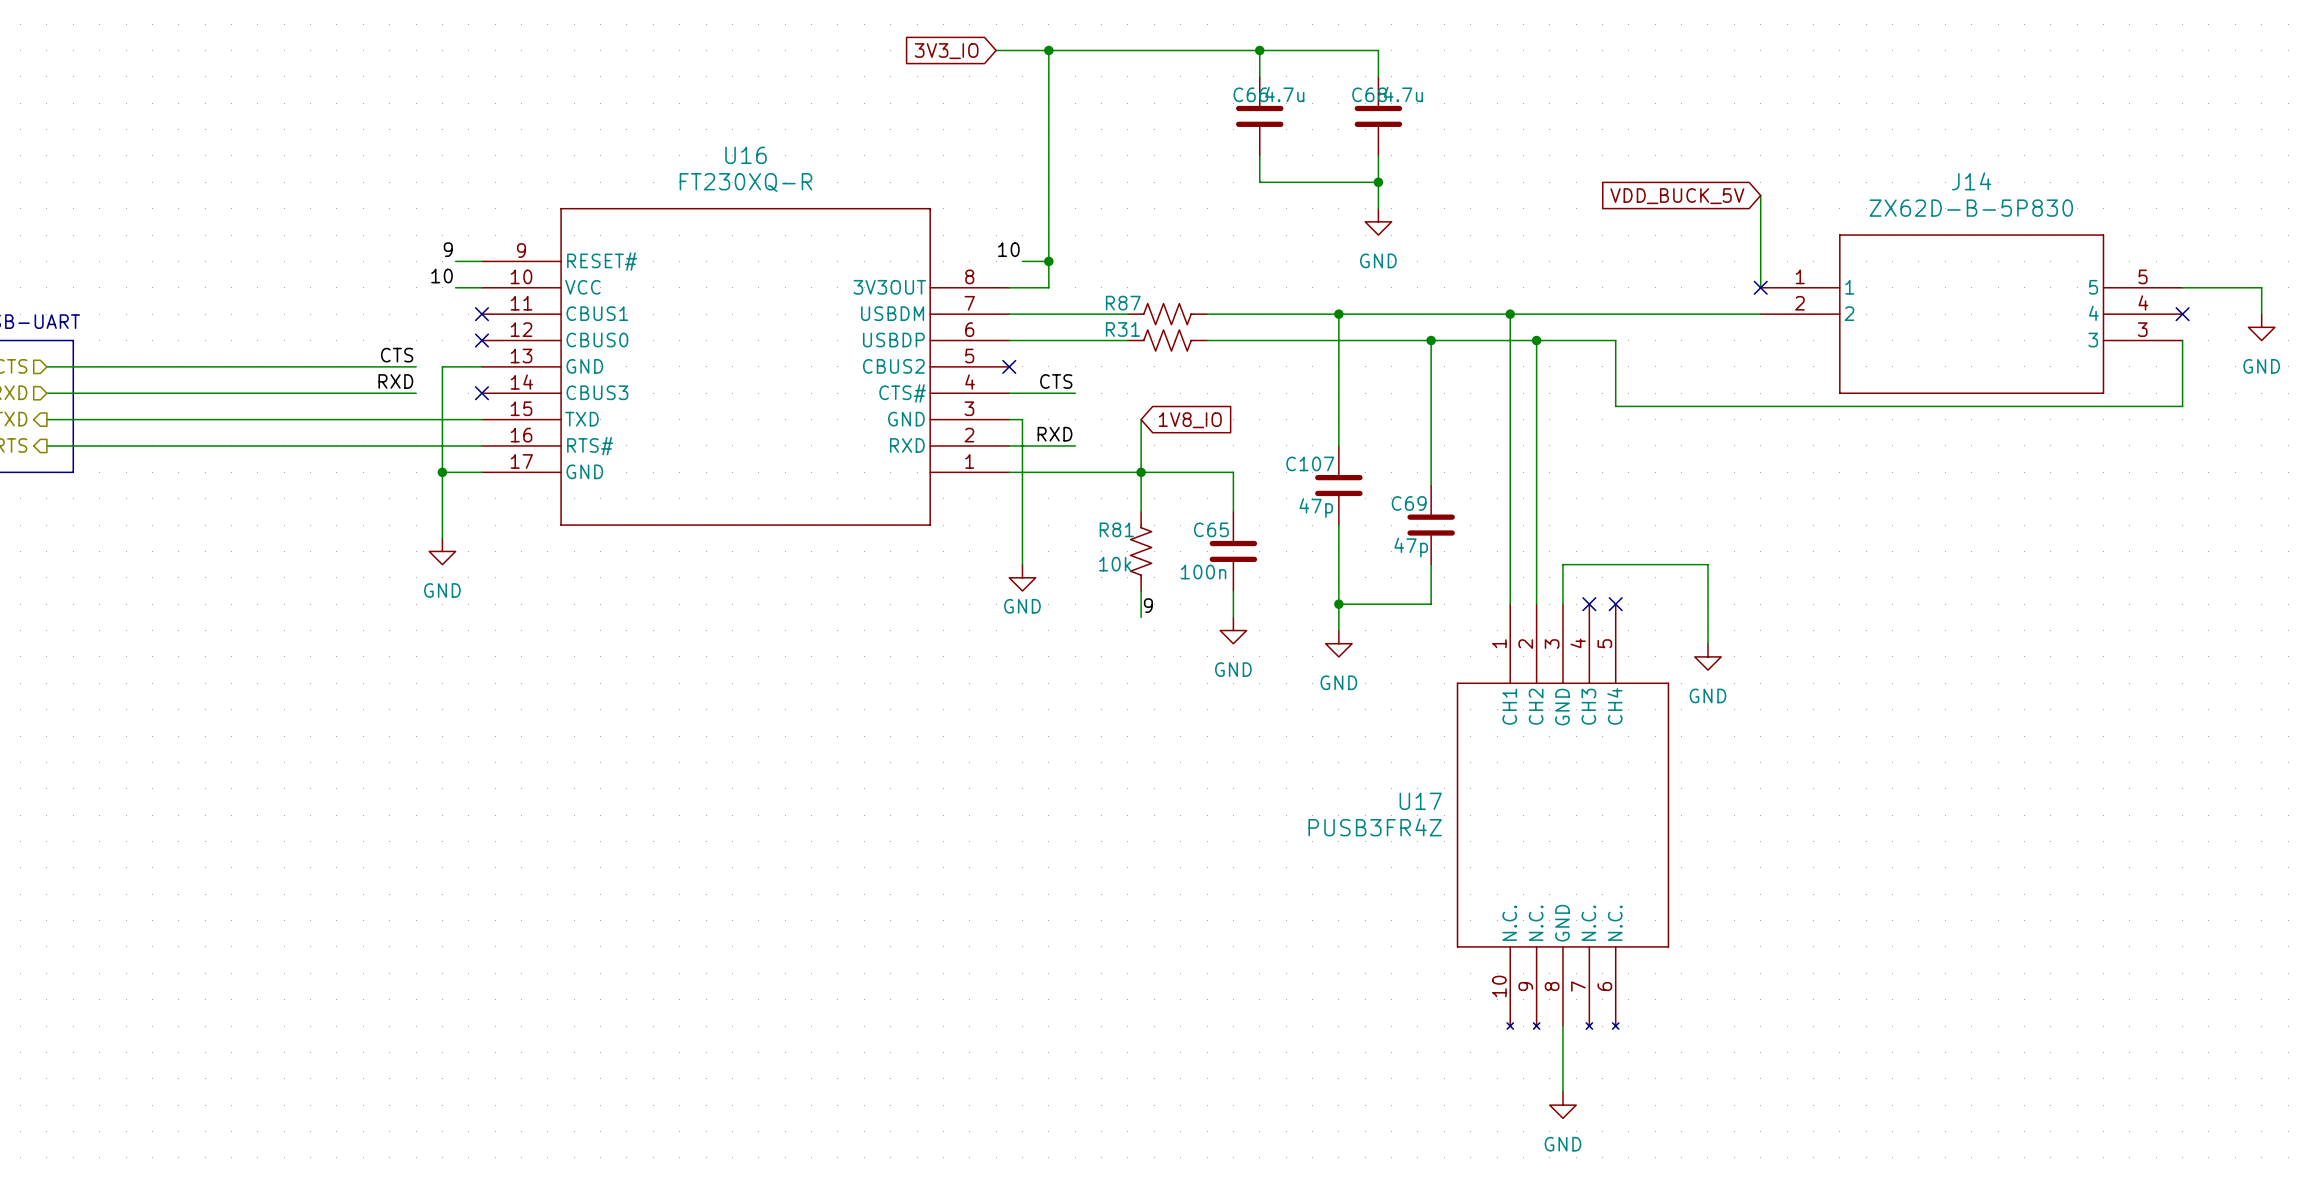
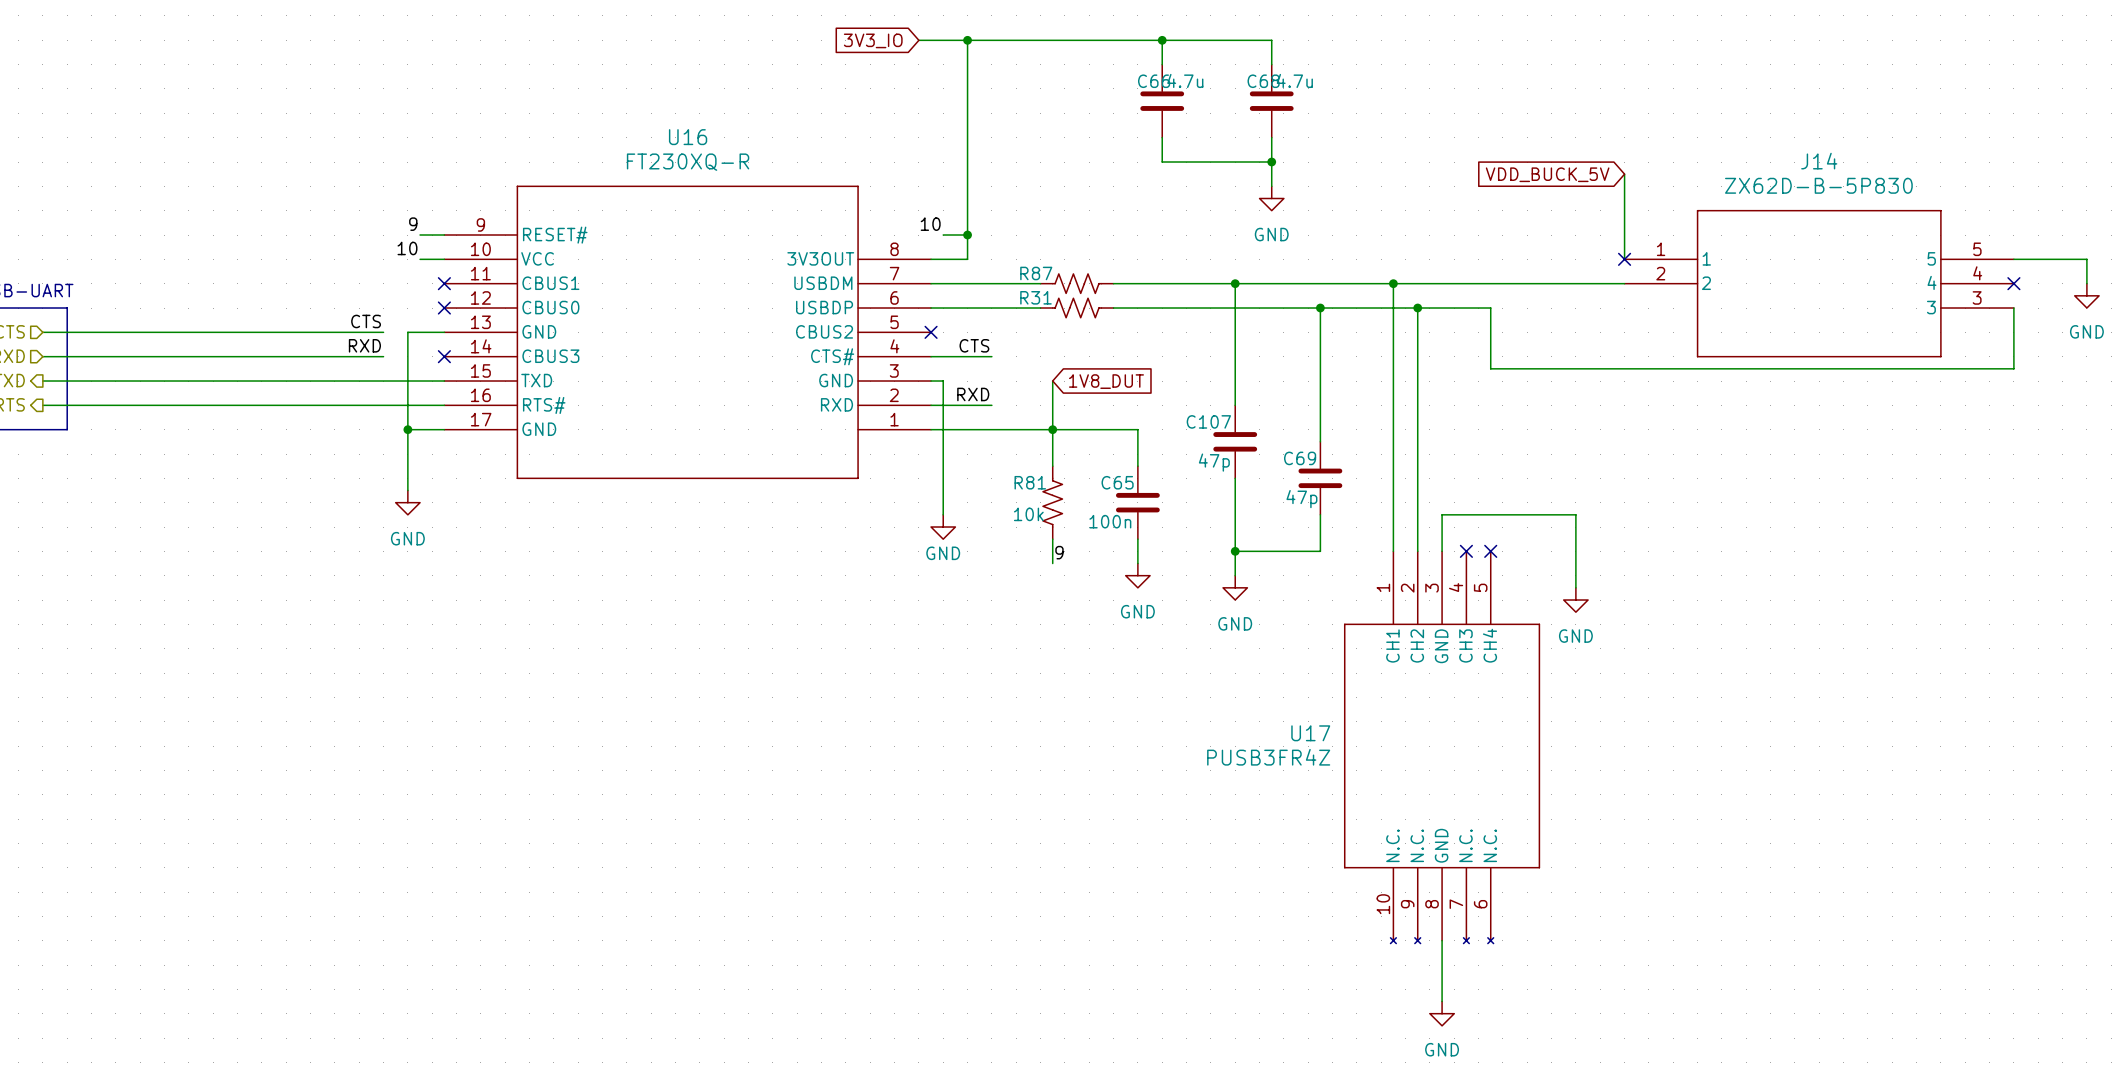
global label: 1V8_IO (1190, 420) -> 1V8_DUT (1106, 381)

